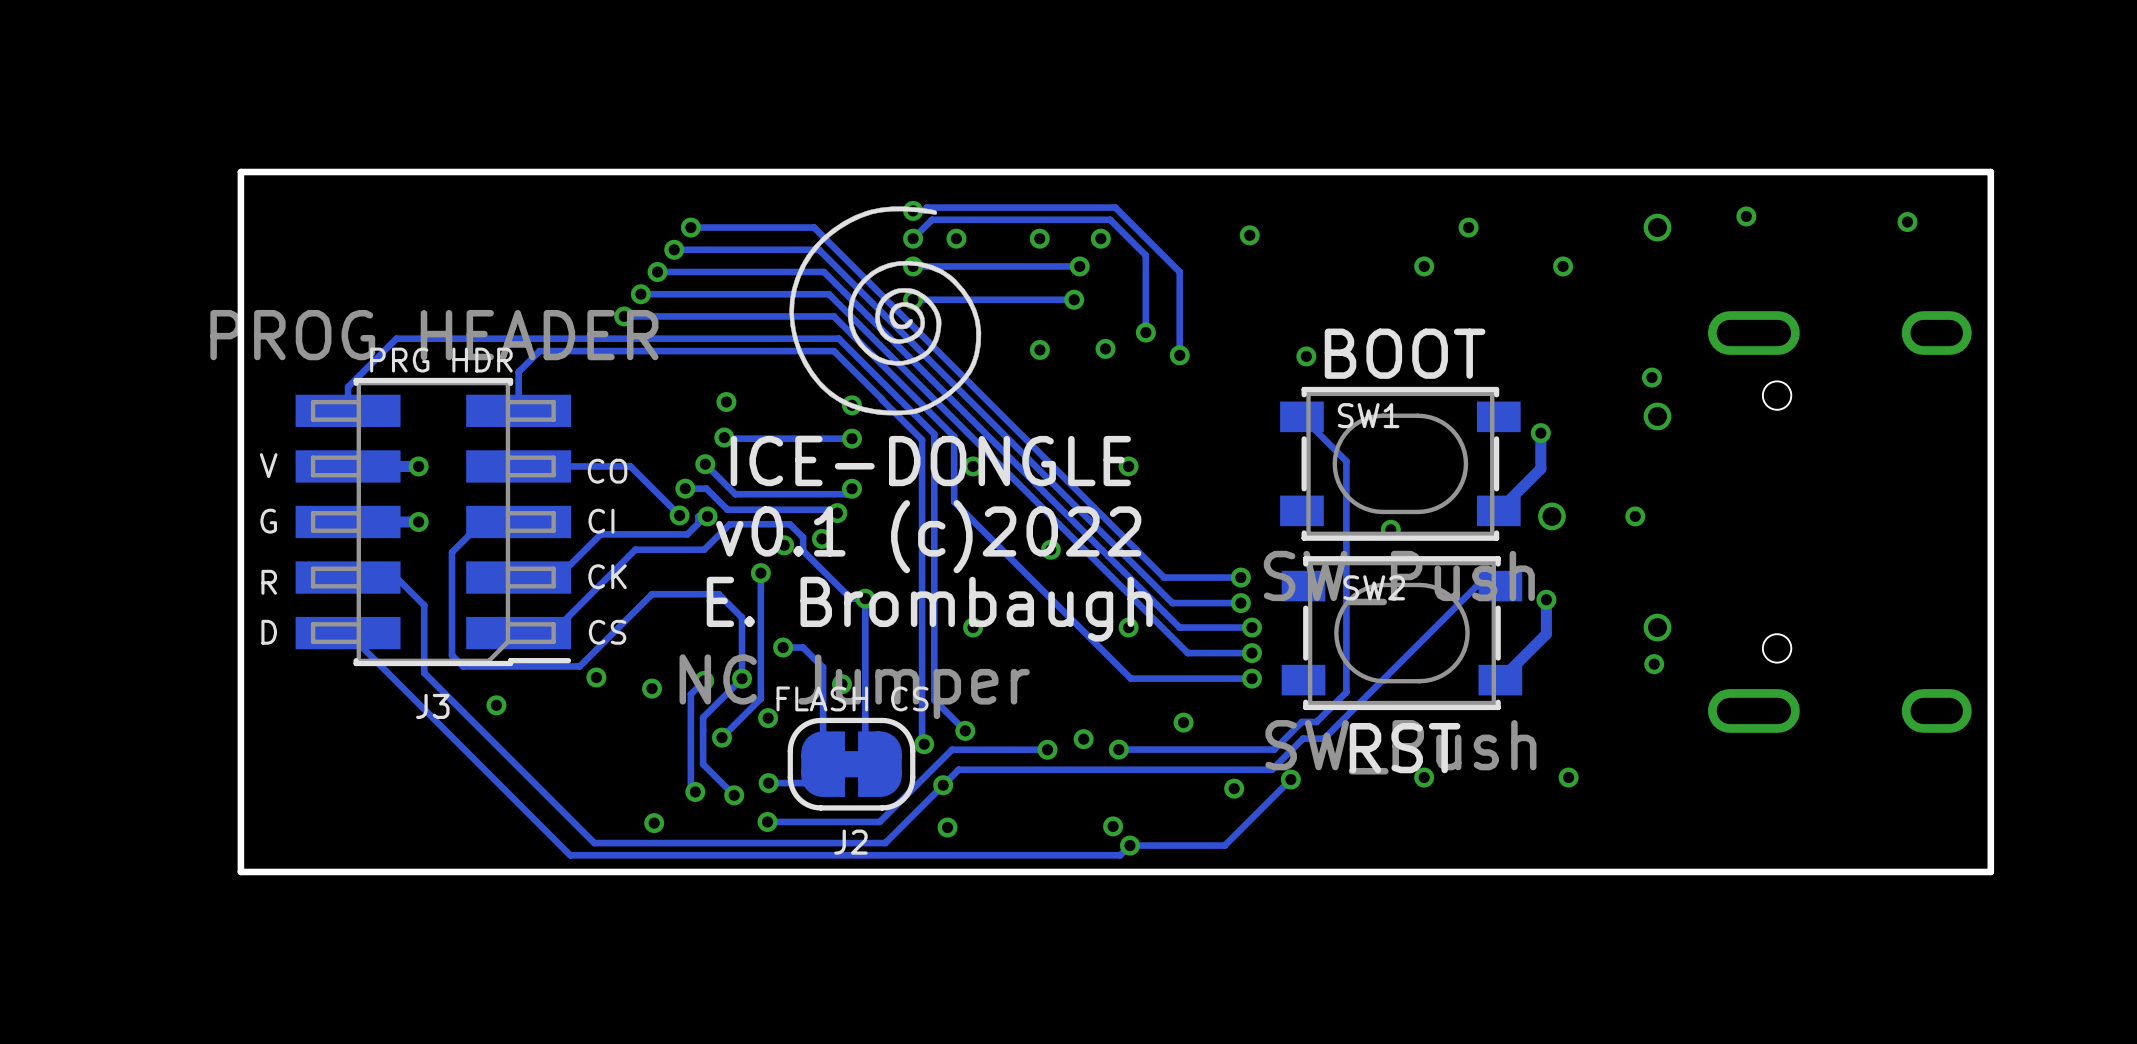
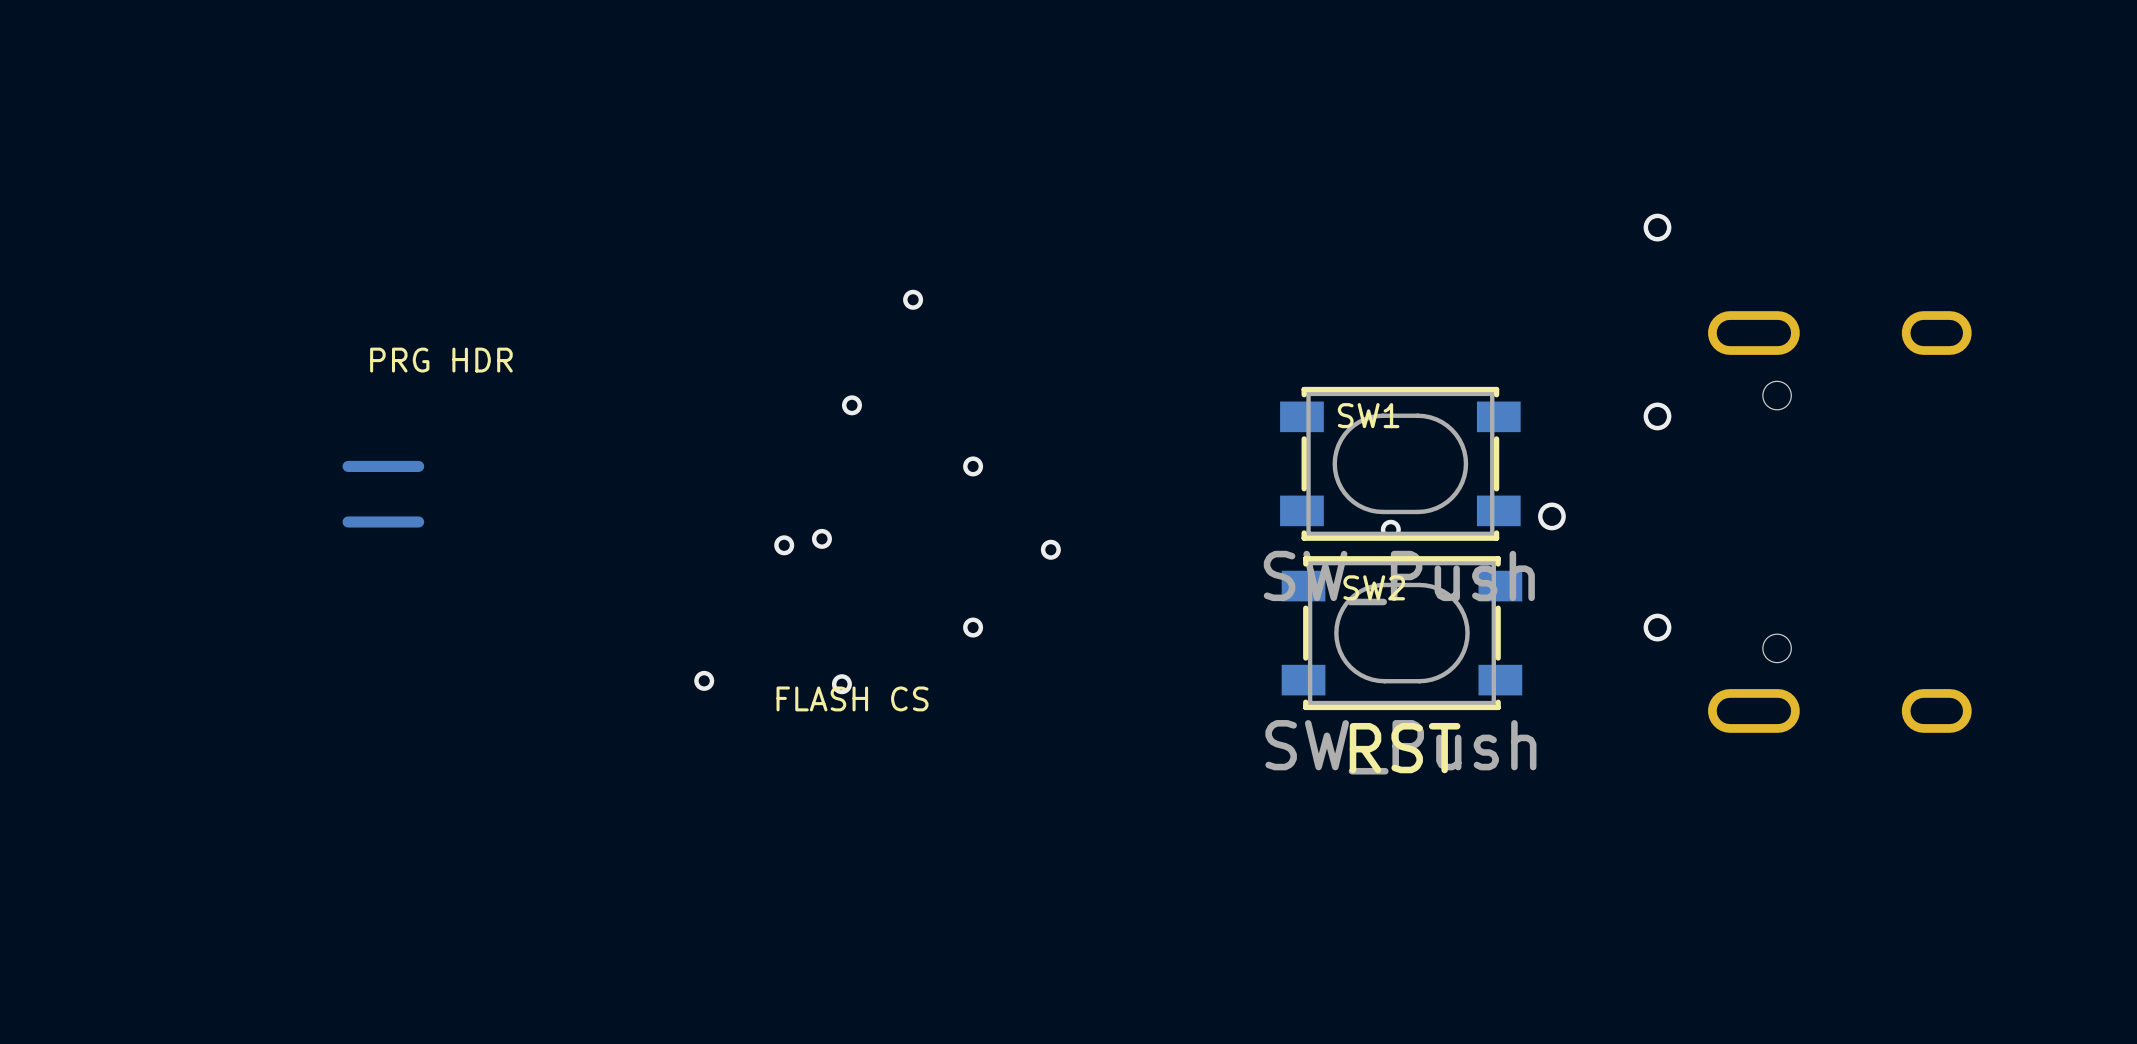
board edge: (1990, 172) (240, 172) (240, 871) (1990, 871) (1990, 172) -> none
drawing: [789, 206, 982, 416] -> none
track: (913, 210) (923, 210) (926, 207) (1115, 207) (1179, 272) (1179, 355) -> none
via: (913, 210) -> none
via: (1746, 216) -> none
via: (1907, 222) -> none
track: (690, 227) (814, 227) (1164, 577) (1240, 577) -> none
via: (690, 227) -> none
via: (1468, 227) -> none
via: (1249, 235) -> none
track: (913, 238) (931, 219) (1110, 219) (1145, 255) (1145, 332) -> none
via: (913, 238) -> none
via: (956, 238) -> none
via: (1039, 238) -> none
via: (1100, 238) -> none
track: (674, 249) (819, 249) (1172, 603) (1240, 603) -> none
via: (674, 249) -> none
via: (913, 266) -> none
track: (1079, 266) (913, 266) -> none
via: (1079, 266) -> none
via: (1424, 266) -> none
via: (1563, 266) -> none
track: (657, 272) (824, 272) (1179, 627) (1251, 627) -> none
via: (657, 272) -> none
track: (640, 294) (828, 294) (1187, 653) (1251, 653) -> none
via: (640, 294) -> none
track: (1074, 299) (913, 299) -> none
via: (1074, 299) -> none
track: (624, 316) (833, 316) (954, 436) (954, 501) (1130, 678) (1251, 678) -> none
via: (624, 316) -> none
via: (1145, 332) -> none
via: (1105, 348) -> none
via: (1039, 349) -> none
text: BOOT (1405, 353) -> none
via: (1179, 355) -> none
via: (1306, 356) -> none
via: (1651, 377) -> none
track: (881, 399) (833, 351) (539, 351) (518, 372) (518, 410) -> none
track: (881, 399) (922, 439) (922, 742) (924, 744) -> none
via: (726, 402) -> none
track: (348, 410) (348, 387) (396, 338) (838, 338) (934, 434) (934, 699) (965, 730) -> none
track: (1301, 416) (1346, 461) (1346, 692) (1316, 721) (1301, 721) (1274, 749) (1118, 749) -> none
track: (1540, 433) (1540, 468) (1498, 510) -> none
via: (1540, 433) -> none
track: (724, 437) (851, 438) -> none
via: (724, 437) -> none
via: (851, 438) -> none
text: ICE-DONGLE (930, 461) -> none
track: (705, 464) (735, 494) (846, 494) (851, 488) -> none
via: (705, 464) -> none
text: V (268, 465) -> none
via: (418, 466) -> none
track: (518, 466) (630, 466) (679, 515) -> none
via: (1128, 466) -> none
text: CO (607, 471) -> none
track: (685, 488) (706, 488) (727, 509) (834, 509) (837, 513) -> none
via: (685, 488) -> none
via: (851, 488) -> none
via: (837, 513) -> none
via: (679, 515) -> none
track: (707, 516) (698, 516) (698, 523) (687, 534) (600, 534) (557, 577) (518, 577) -> none
via: (707, 516) -> none
via: (1635, 516) -> none
text: G (268, 521) -> none
via: (418, 521) -> none
J3: PROG HEADER (433, 521) -> none
track: (518, 521) (482, 521) (452, 552) (452, 655) (463, 666) (579, 666) (651, 594) (718, 594) (742, 617) (742, 678) (703, 717) (703, 764) (734, 795) -> none
text: CI (601, 521) -> none
text: v0.1 (c)2022 (928, 536) -> none
track: (760, 573) (760, 698) (721, 737) -> none
via: (760, 573) -> none
text: CK (607, 576) -> none
track: (348, 577) (396, 577) (424, 605) (424, 672) (594, 843) (885, 843) (958, 769) (1271, 769) (1303, 738) (1324, 738) (1476, 586) (1500, 586) -> none
via: (1240, 577) -> none
text: R (269, 582) -> none
via: (865, 598) -> none
track: (1546, 599) (1546, 634) (1500, 680) -> none
via: (1546, 599) -> none
via: (1240, 603) -> none
text: E. Brombaugh (929, 609) -> none
via: (1128, 627) -> none
via: (1251, 627) -> none
text: D (269, 632) -> none
text: CS (607, 632) -> none
track: (348, 633) (570, 855) (1120, 855) (1129, 845) (1224, 845) (1290, 779) -> none
track: (518, 633) (552, 633) (635, 549) (704, 549) (729, 524) (789, 524) (803, 537) (803, 550) (850, 598) (865, 598) (865, 749) (879, 764) -> none
track: (783, 647) (803, 647) (823, 667) (823, 764) (804, 783) (768, 783) -> none
via: (783, 647) -> none
via: (1251, 653) -> none
via: (1654, 664) -> none
via: (596, 677) -> none
via: (742, 678) -> none
via: (1251, 678) -> none
track: (704, 680) (690, 694) (690, 787) (695, 791) -> none
via: (651, 688) -> none
via: (496, 705) -> none
via: (768, 718) -> none
via: (1183, 722) -> none
via: (965, 730) -> none
via: (721, 737) -> none
via: (1083, 739) -> none
via: (924, 744) -> none
track: (1047, 749) (951, 749) (879, 821) (767, 821) -> none
via: (1047, 749) -> none
via: (1118, 749) -> none
J2: NC Jumper (851, 764) -> none
via: (1424, 777) -> none
via: (1568, 777) -> none
via: (1290, 779) -> none
via: (768, 783) -> none
via: (943, 785) -> none
via: (1234, 788) -> none
via: (695, 791) -> none
via: (734, 795) -> none
via: (767, 821) -> none
via: (654, 823) -> none
via: (1113, 826) -> none
via: (947, 827) -> none
via: (1129, 845) -> none

